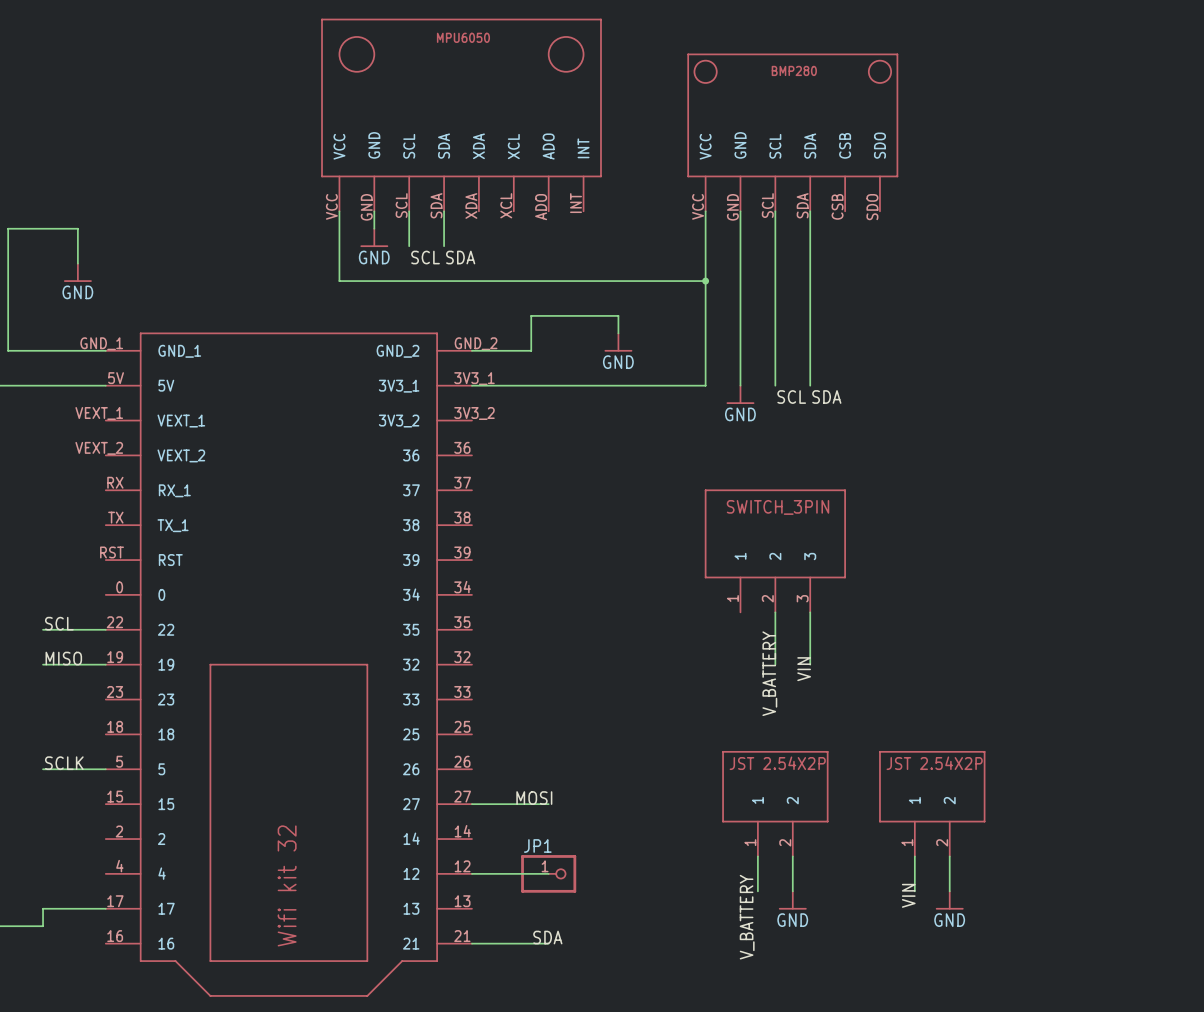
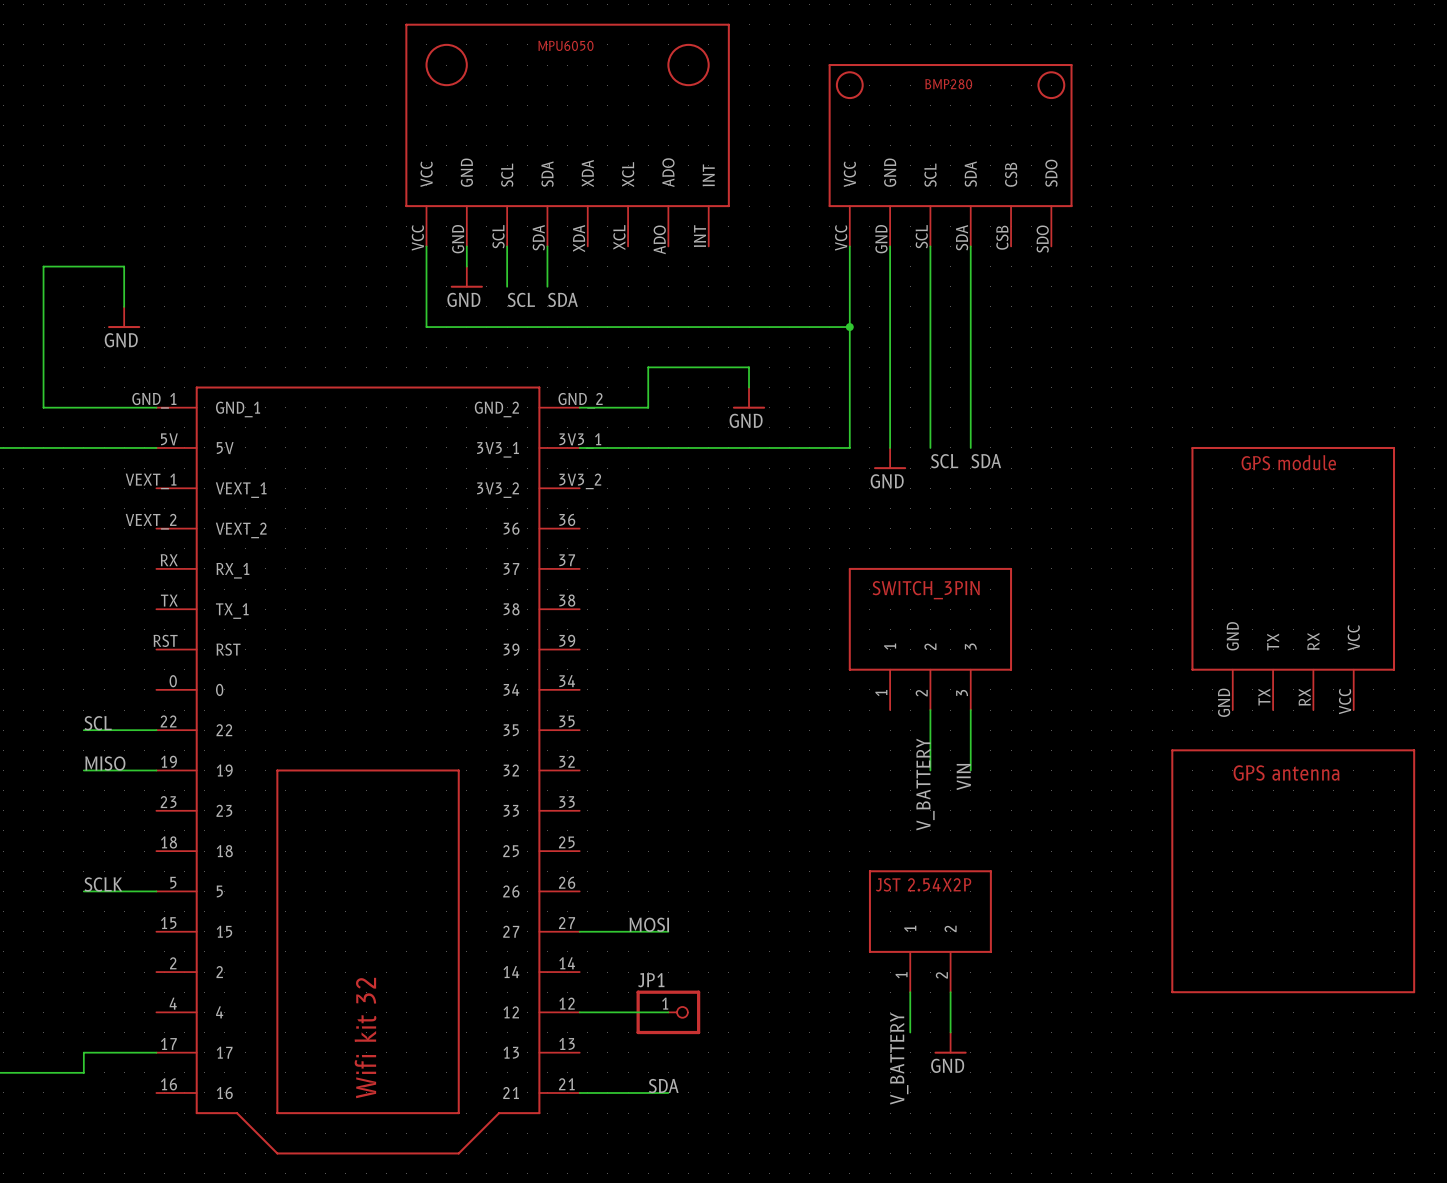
part: none -> (1293, 578)
part: none -> (1293, 871)
part: (932, 803) -> none
wire: (914, 856) (914, 891) -> none
wire: (949, 856) (949, 891) -> none
label: VIN (908, 895) -> none
power symbol: GND (949, 900) -> none

